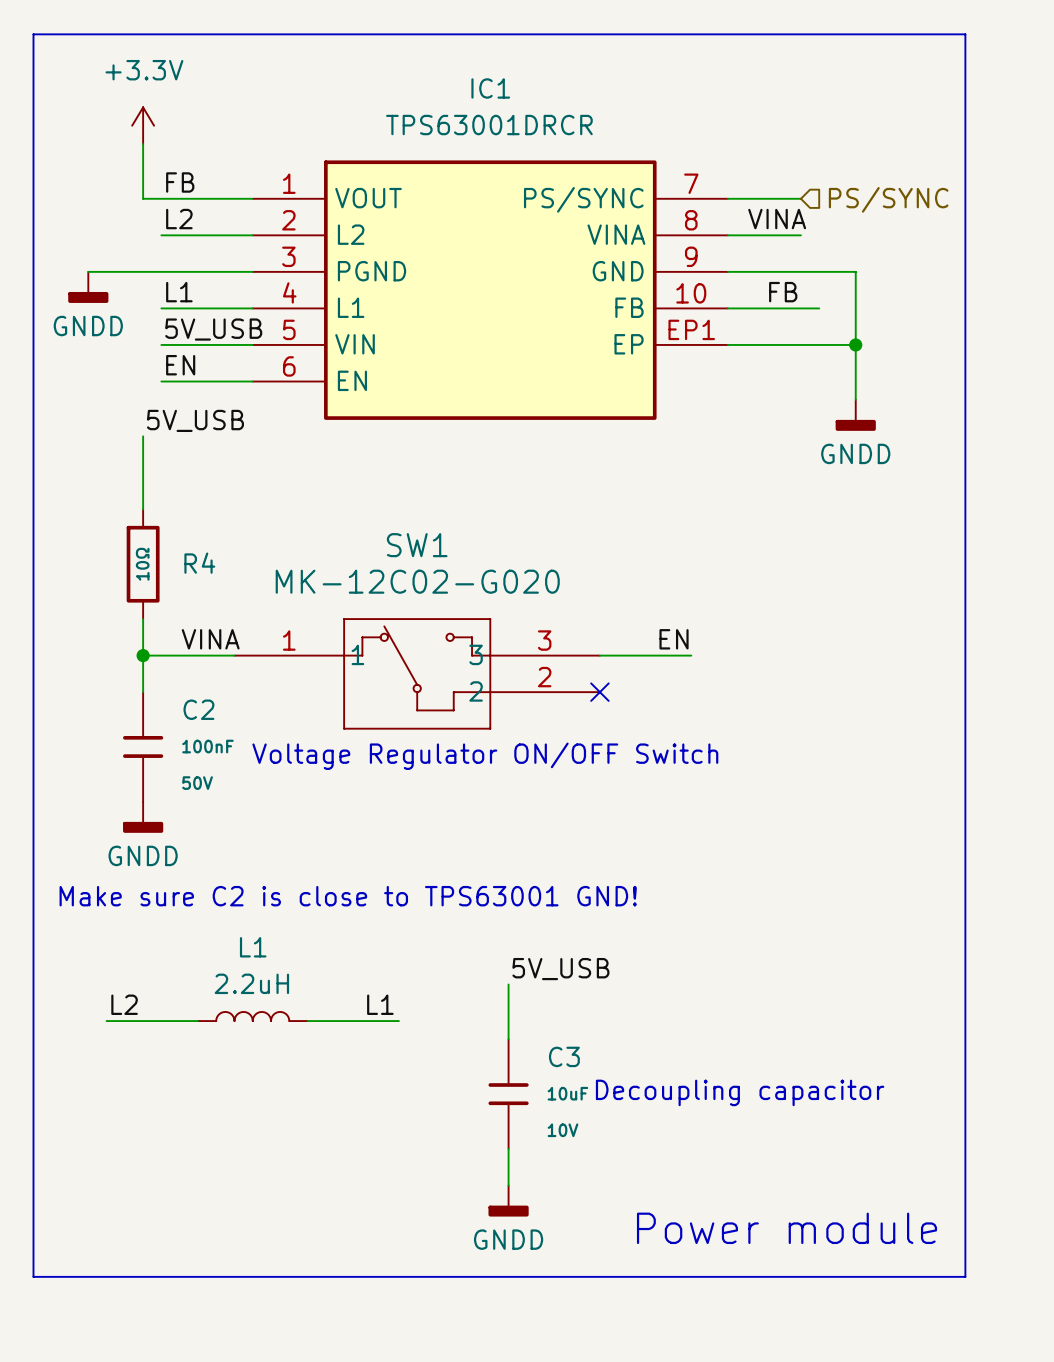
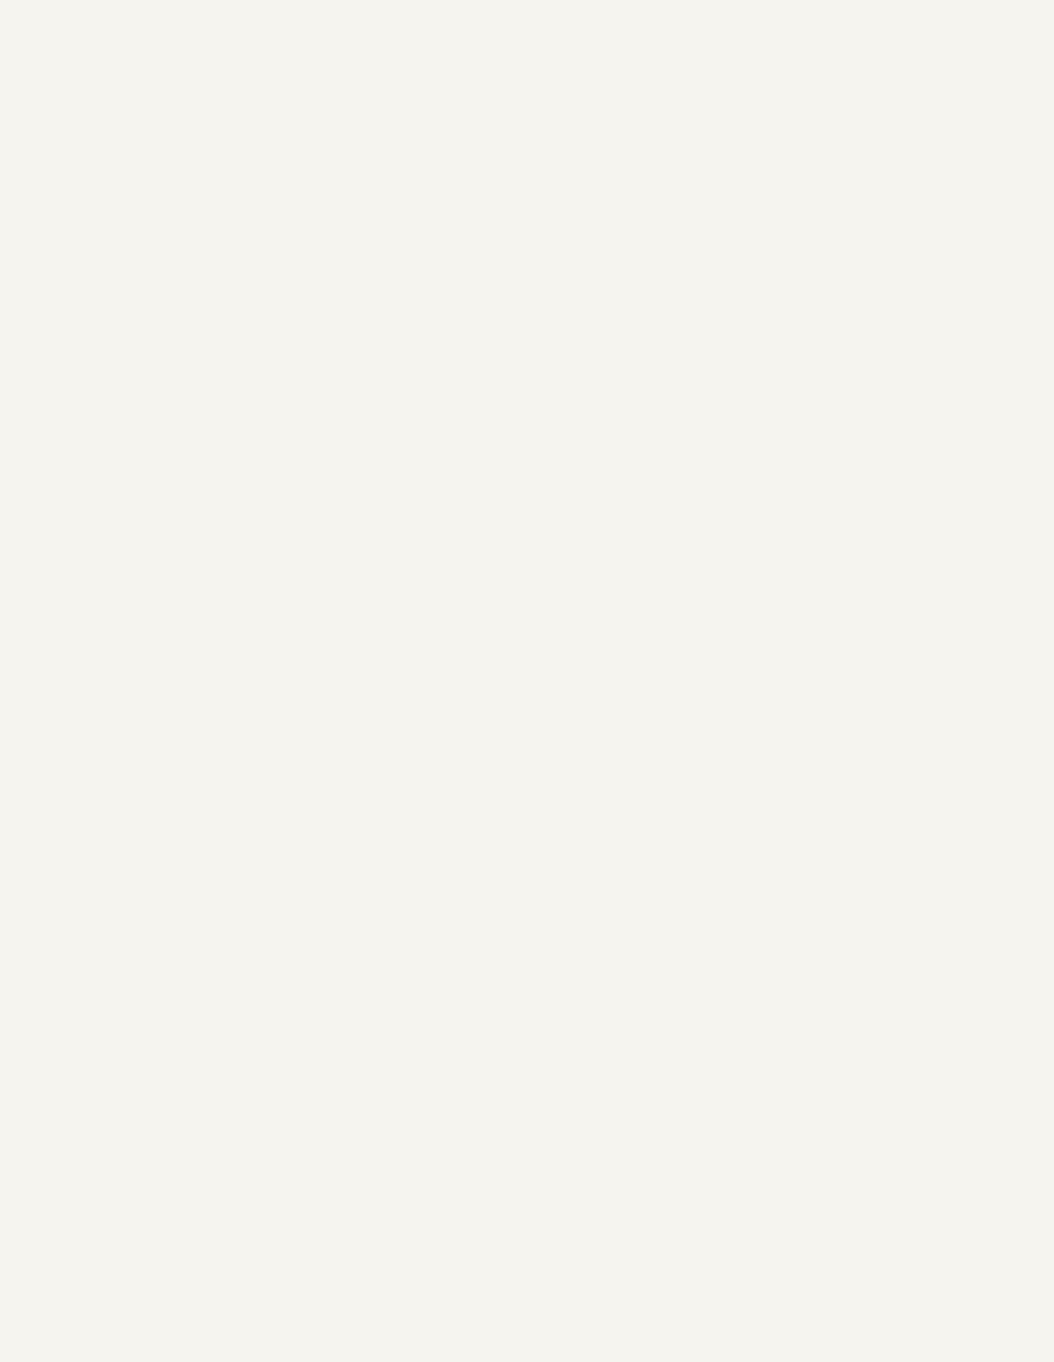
line: (33, 34) (965, 34) (965, 1276) (33, 1276) (33, 34) -> none
power symbol: +3.3V (143, 125) -> none
wire: (143, 143) (143, 198) (252, 198) -> none
label: FB (180, 182) -> none
wire: (727, 198) (800, 198) -> none
hierarchical label: PS/SYNC (888, 199) -> none
label: L2 (179, 219) -> none
label: VINA (777, 219) -> none
wire: (161, 235) (252, 235) -> none
wire: (727, 235) (800, 235) -> none
wire: (88, 271) (252, 271) -> none
wire: (727, 271) (855, 271) (855, 399) -> none
power symbol: GNDD (88, 287) -> none
IC1: TPS63001DRCR (490, 290) -> none
label: L1 (179, 292) -> none
label: FB (783, 292) -> none
wire: (161, 308) (252, 308) -> none
wire: (727, 308) (819, 308) -> none
label: 5V_USB (213, 329) -> none
wire: (161, 344) (252, 344) -> none
wire: (727, 344) (855, 344) -> none
junction: (855, 344) -> none
label: EN (180, 365) -> none
wire: (161, 381) (252, 381) -> none
power symbol: GNDD (855, 415) -> none
label: 5V_USB (195, 420) -> none
wire: (143, 436) (143, 509) -> none
R4: 10Ω (143, 564) -> none
wire: (143, 619) (143, 692) -> none
label: VINA (210, 639) -> none
label: EN (674, 639) -> none
wire: (143, 655) (234, 655) -> none
junction: (143, 655) -> none
wire: (599, 655) (691, 655) -> none
SW1: MK-12C02-G020 (417, 673) -> none
no-connect mark: (599, 692) -> none
C2: 100nF (143, 746) -> none
text: Voltage Regulator ON/OFF Switch (485, 756) -> none
power symbol: GNDD (143, 817) -> none
text: Make sure C2 is close to TPS63001 GND! (348, 896) -> none
label: 5V_USB (560, 969) -> none
wire: (508, 984) (508, 1039) -> none
label: L2 (124, 1004) -> none
label: L1 (380, 1004) -> none
L1: 2.2uH (252, 1016) -> none
wire: (106, 1021) (197, 1021) -> none
wire: (307, 1021) (398, 1021) -> none
text: Decoupling capacitor (740, 1092) -> none
C3: 10uF (508, 1094) -> none
wire: (508, 1148) (508, 1185) -> none
power symbol: GNDD (508, 1201) -> none
text: Power module (787, 1228) -> none

